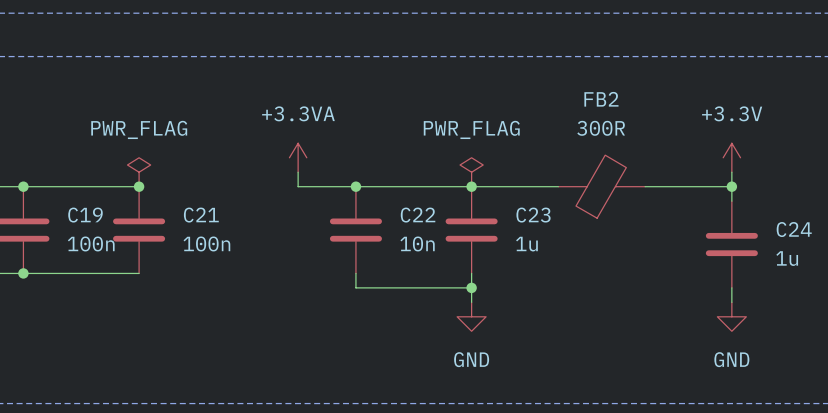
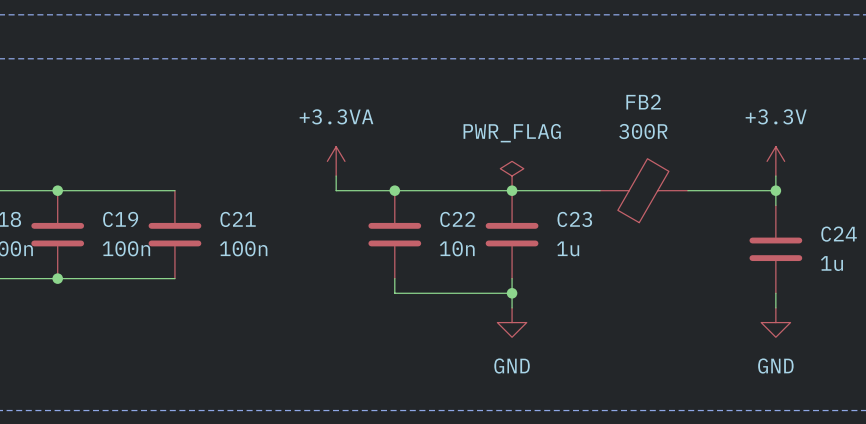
power symbol: PWR_FLAG (139, 172) -> none
junction: (139, 186) -> none

